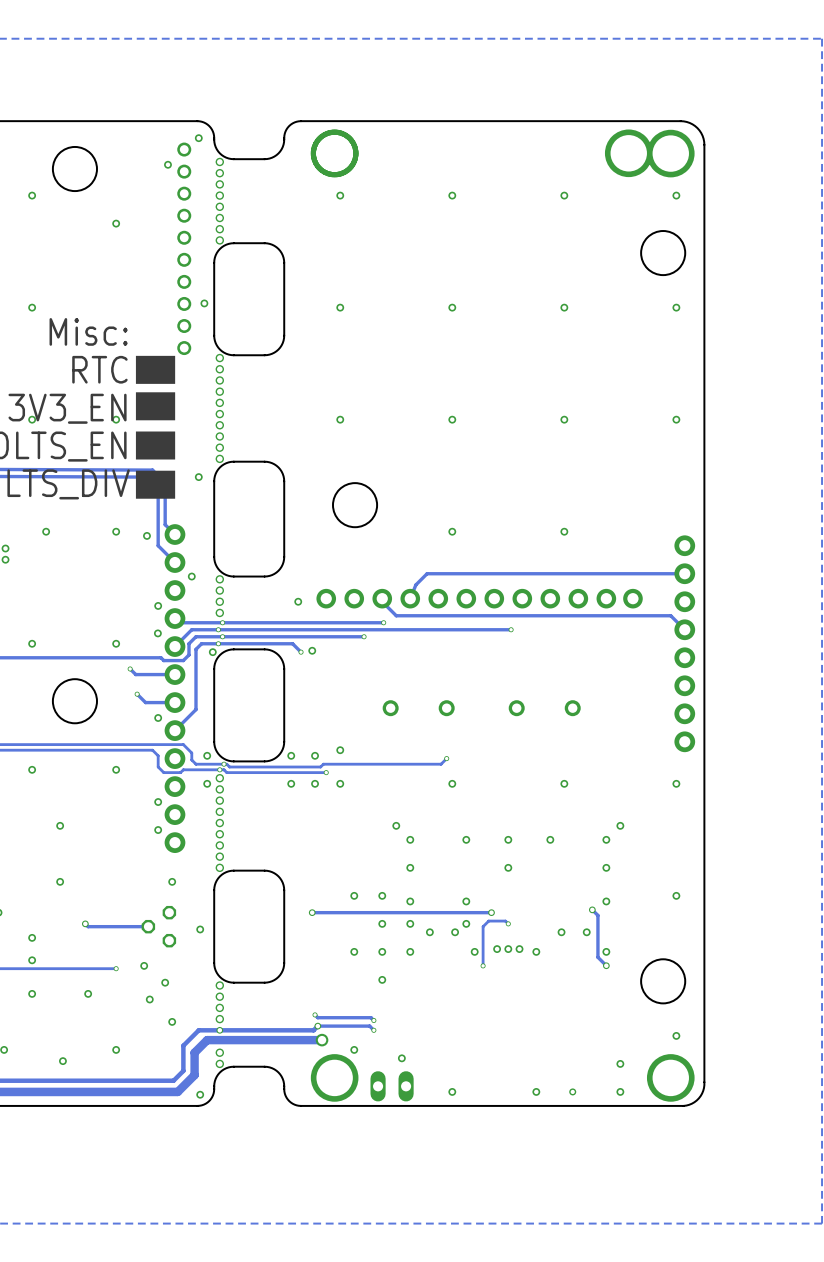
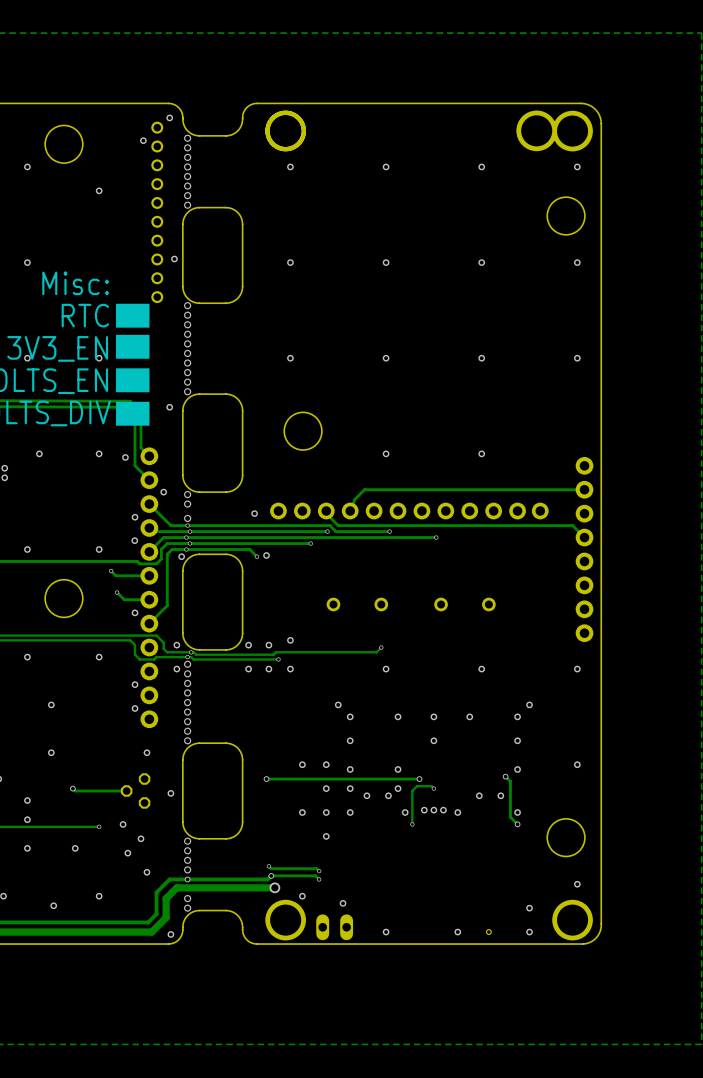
track: none -> (149, 504) (170, 525) (329, 525) (335, 531) (389, 531)
via: (219, 601) -> none
via: none -> (187, 518)
via: (219, 612) -> none
via: none -> (187, 525)
via: none -> (389, 531)

